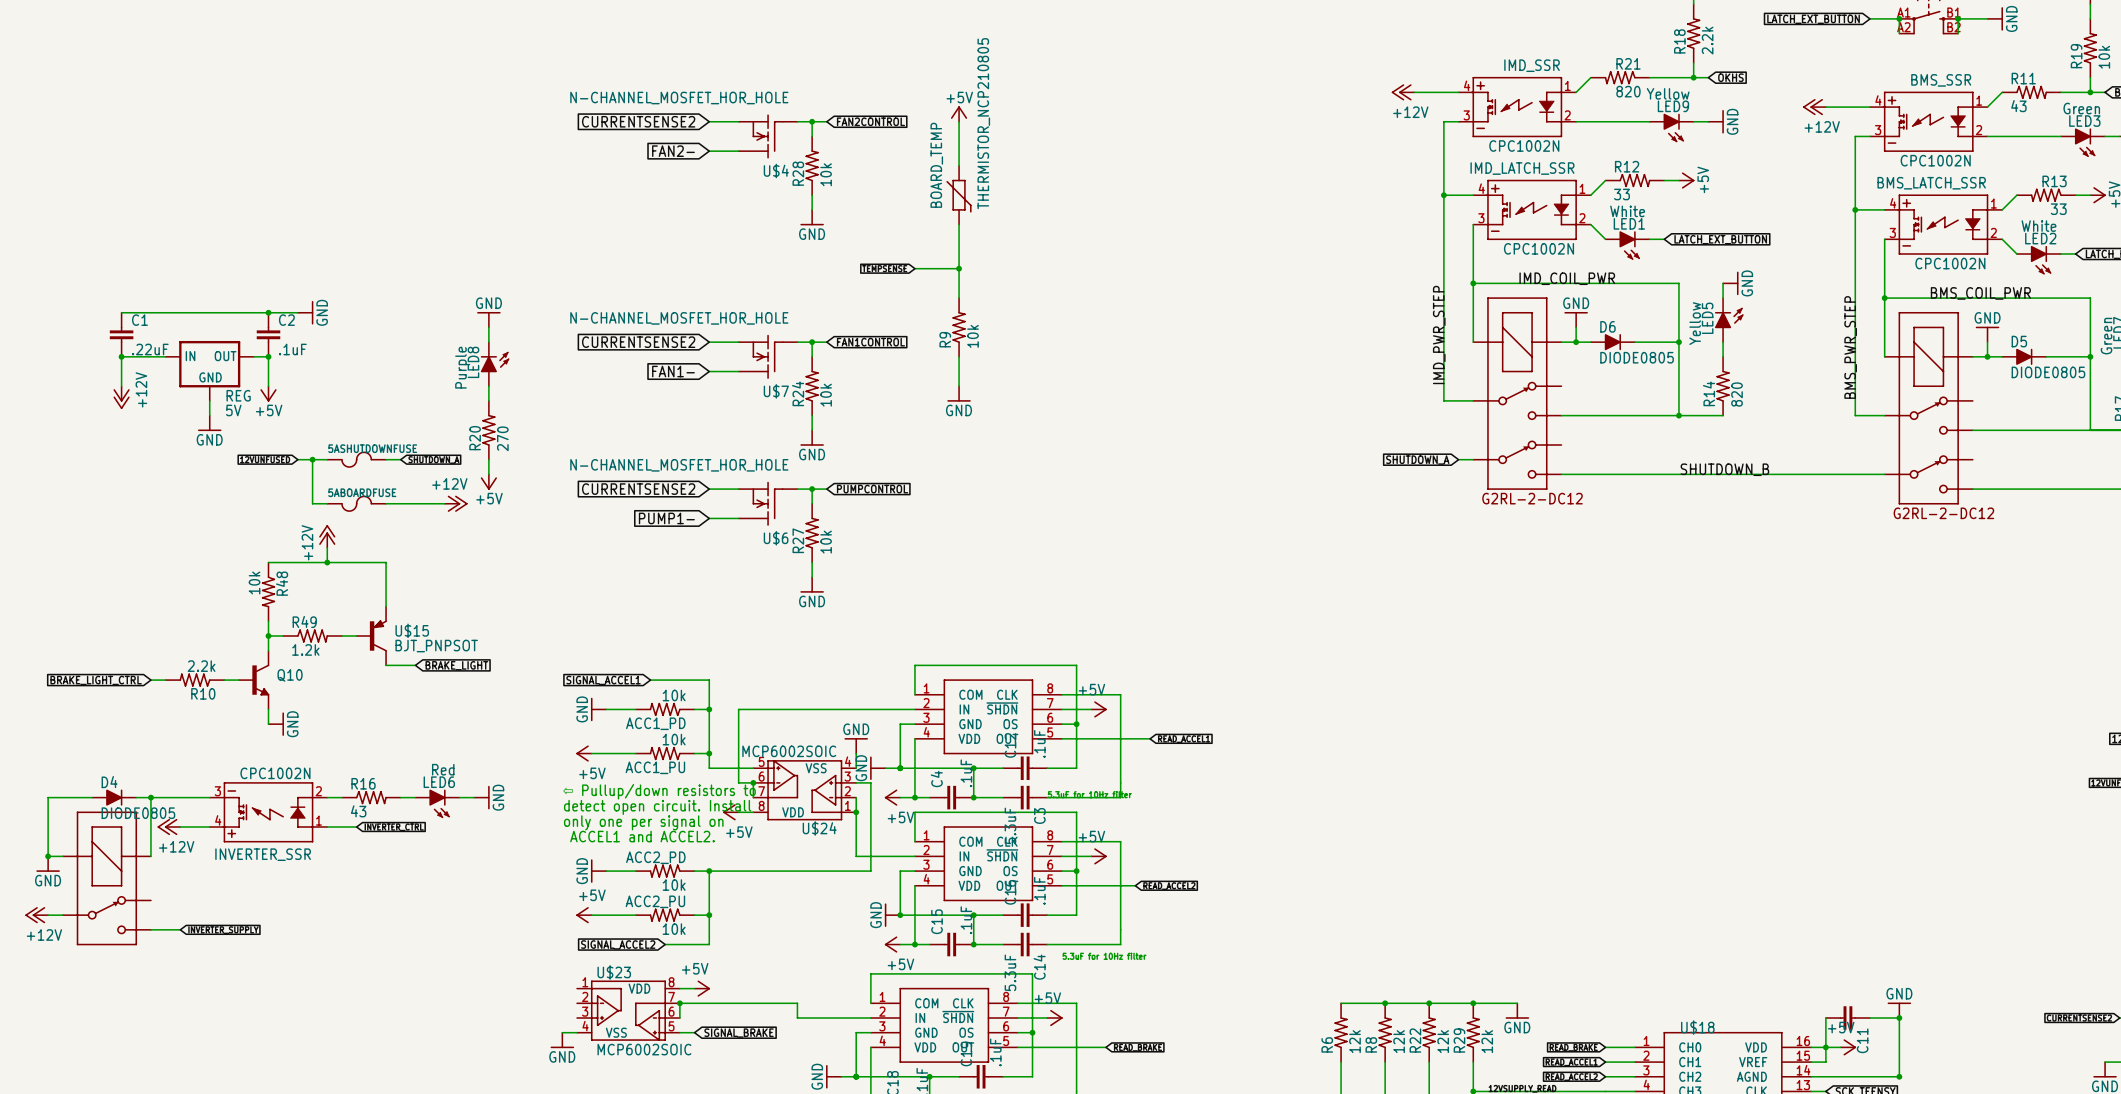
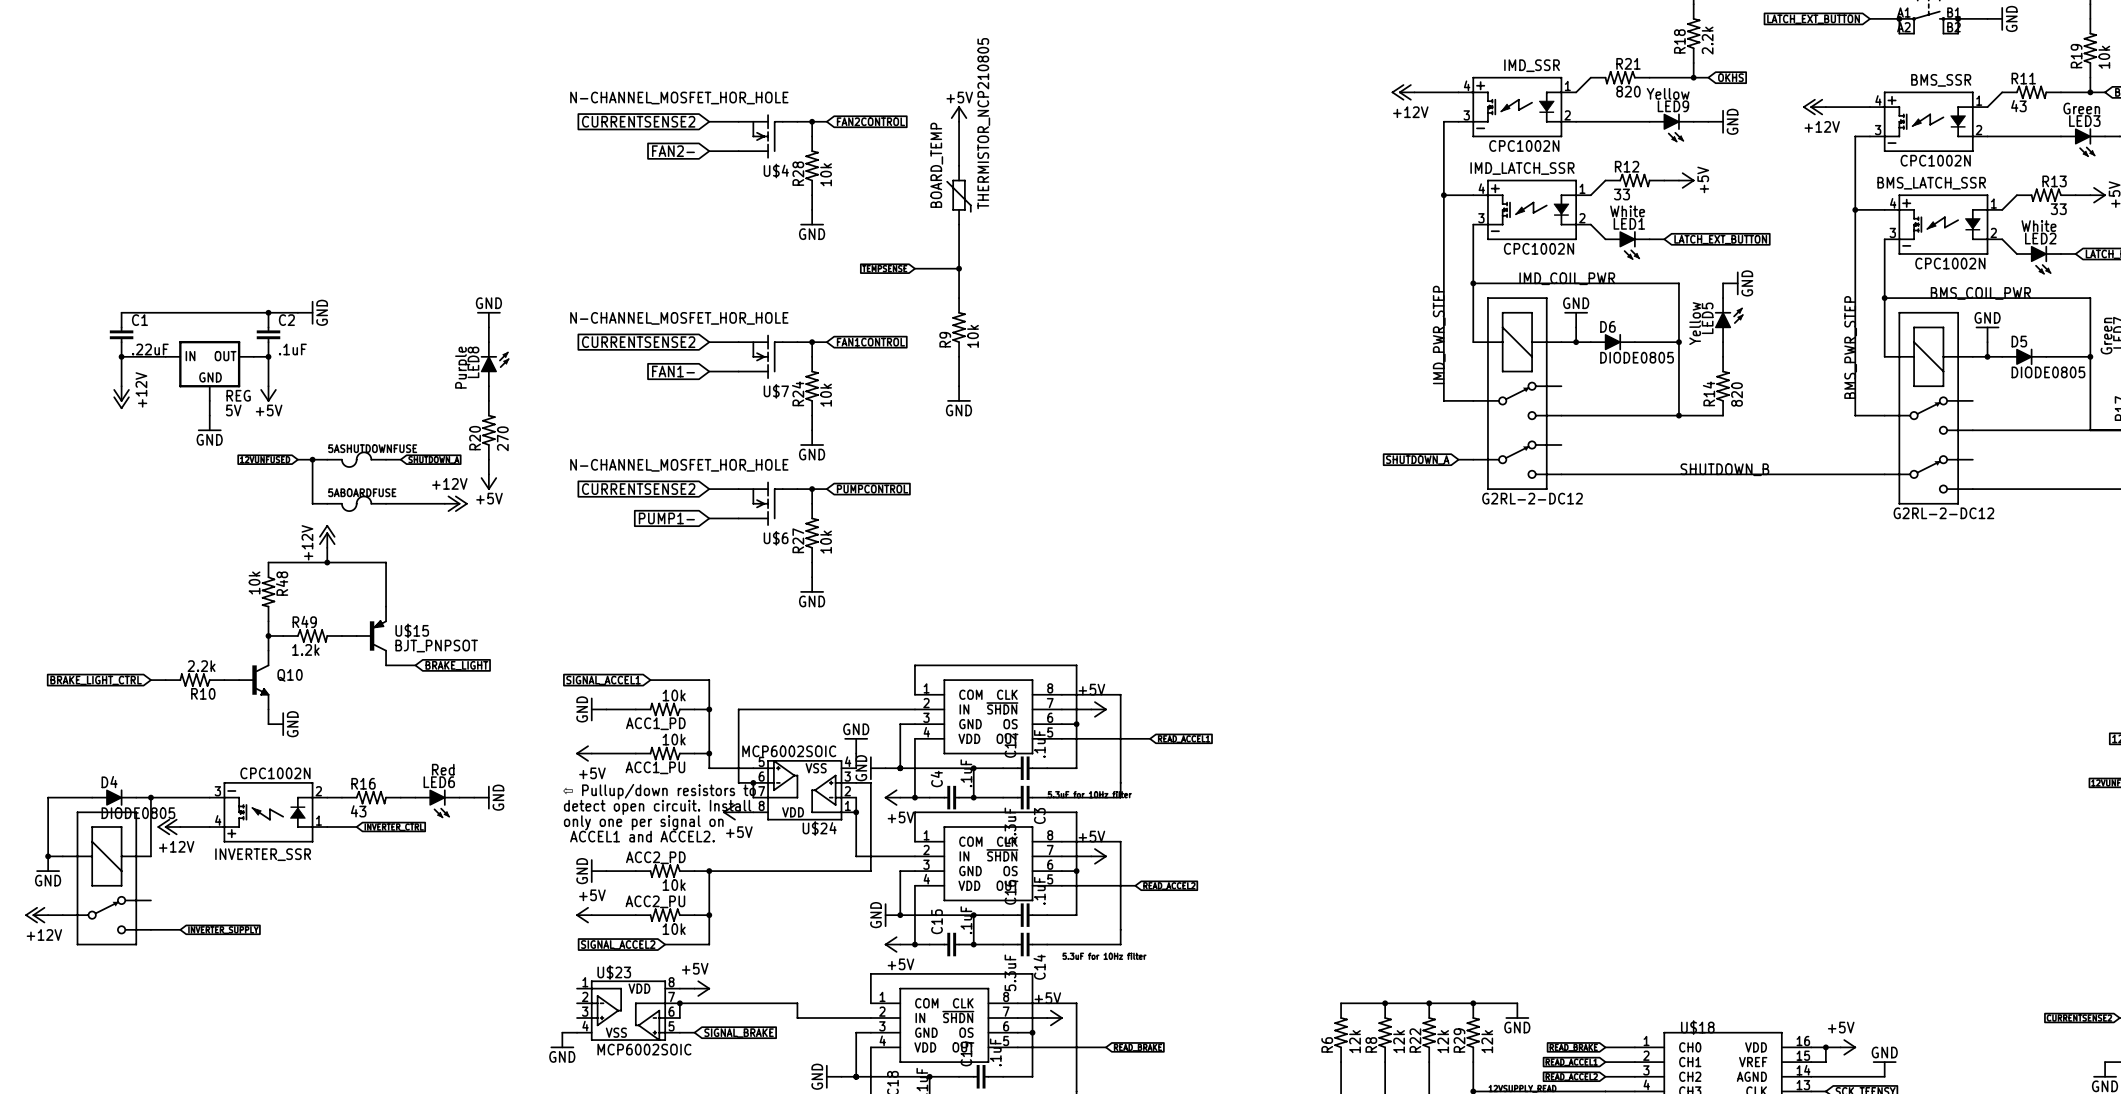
power symbol position: GND (1899, 1010) -> GND (1884, 1069)
wire: (1825, 1018) (1825, 1047) -> none
C11: (1847, 1018) -> none
wire: (1869, 1018) (1899, 1018) (1899, 1076) (1884, 1076) -> none
junction: (1899, 1018) -> none
junction: (1899, 1076) -> none

